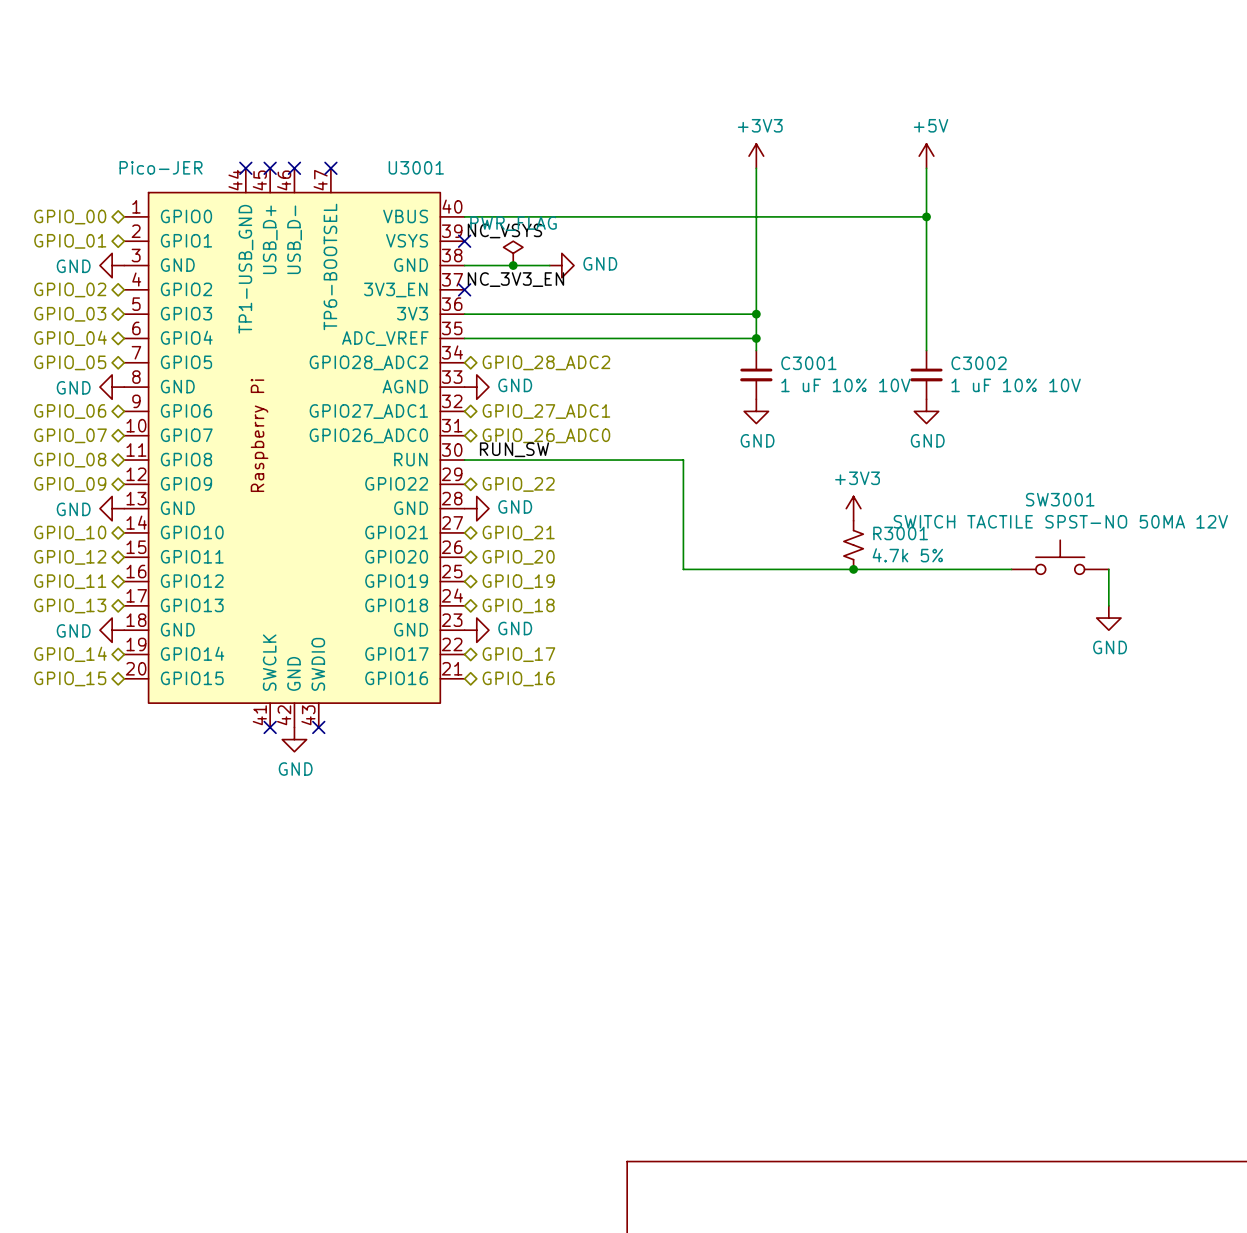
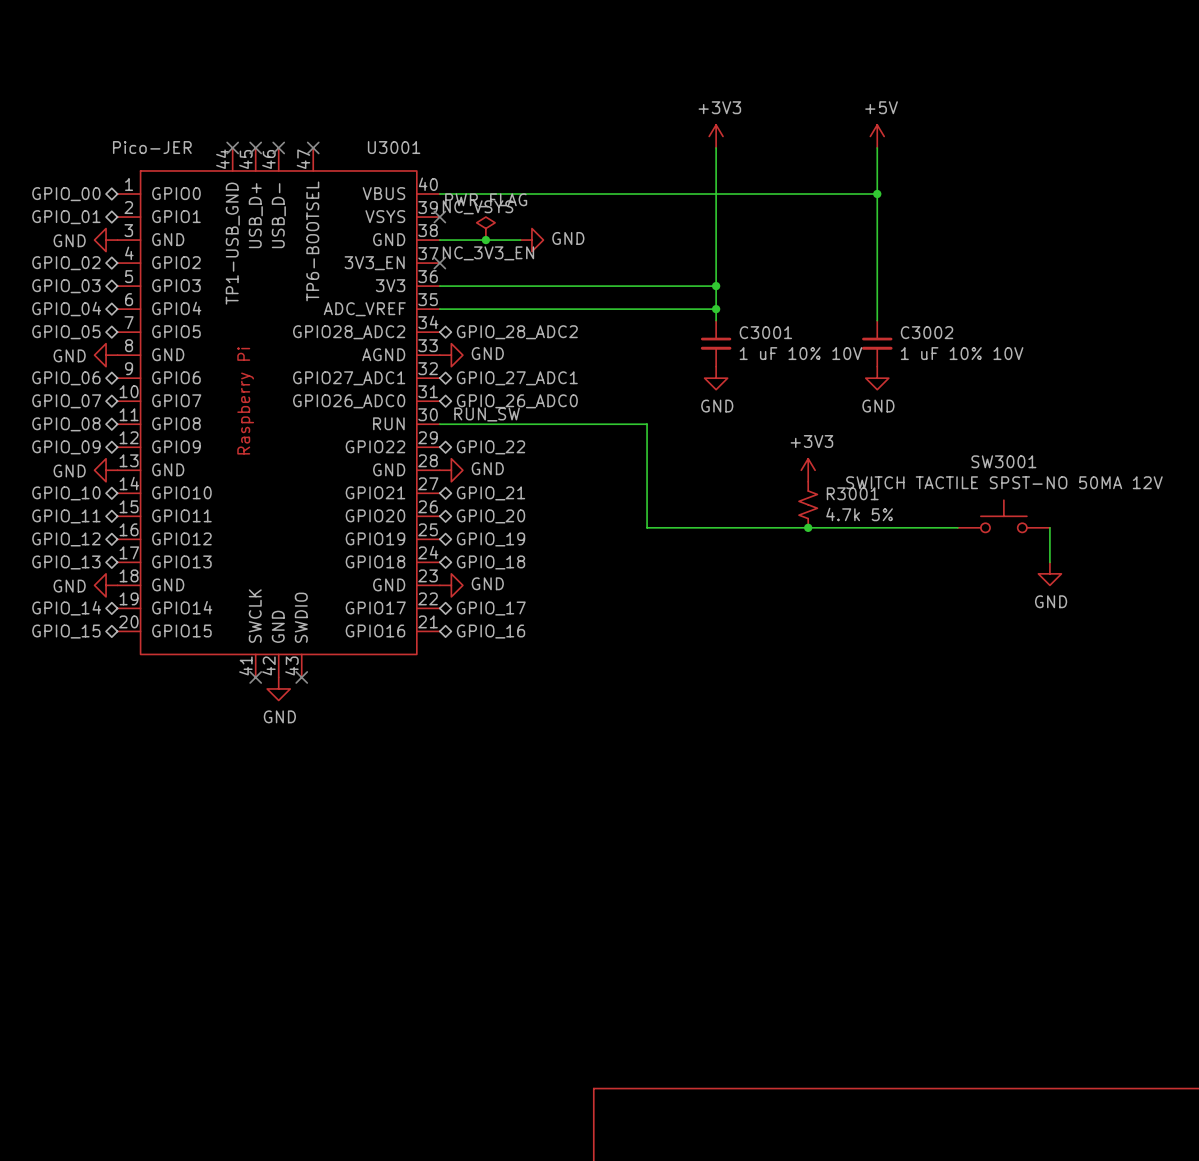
hierarchical label: GPIO_12 (70, 557) -> GPIO_11 (66, 516)
hierarchical label: GPIO_11 (70, 581) -> GPIO_12 (66, 539)

